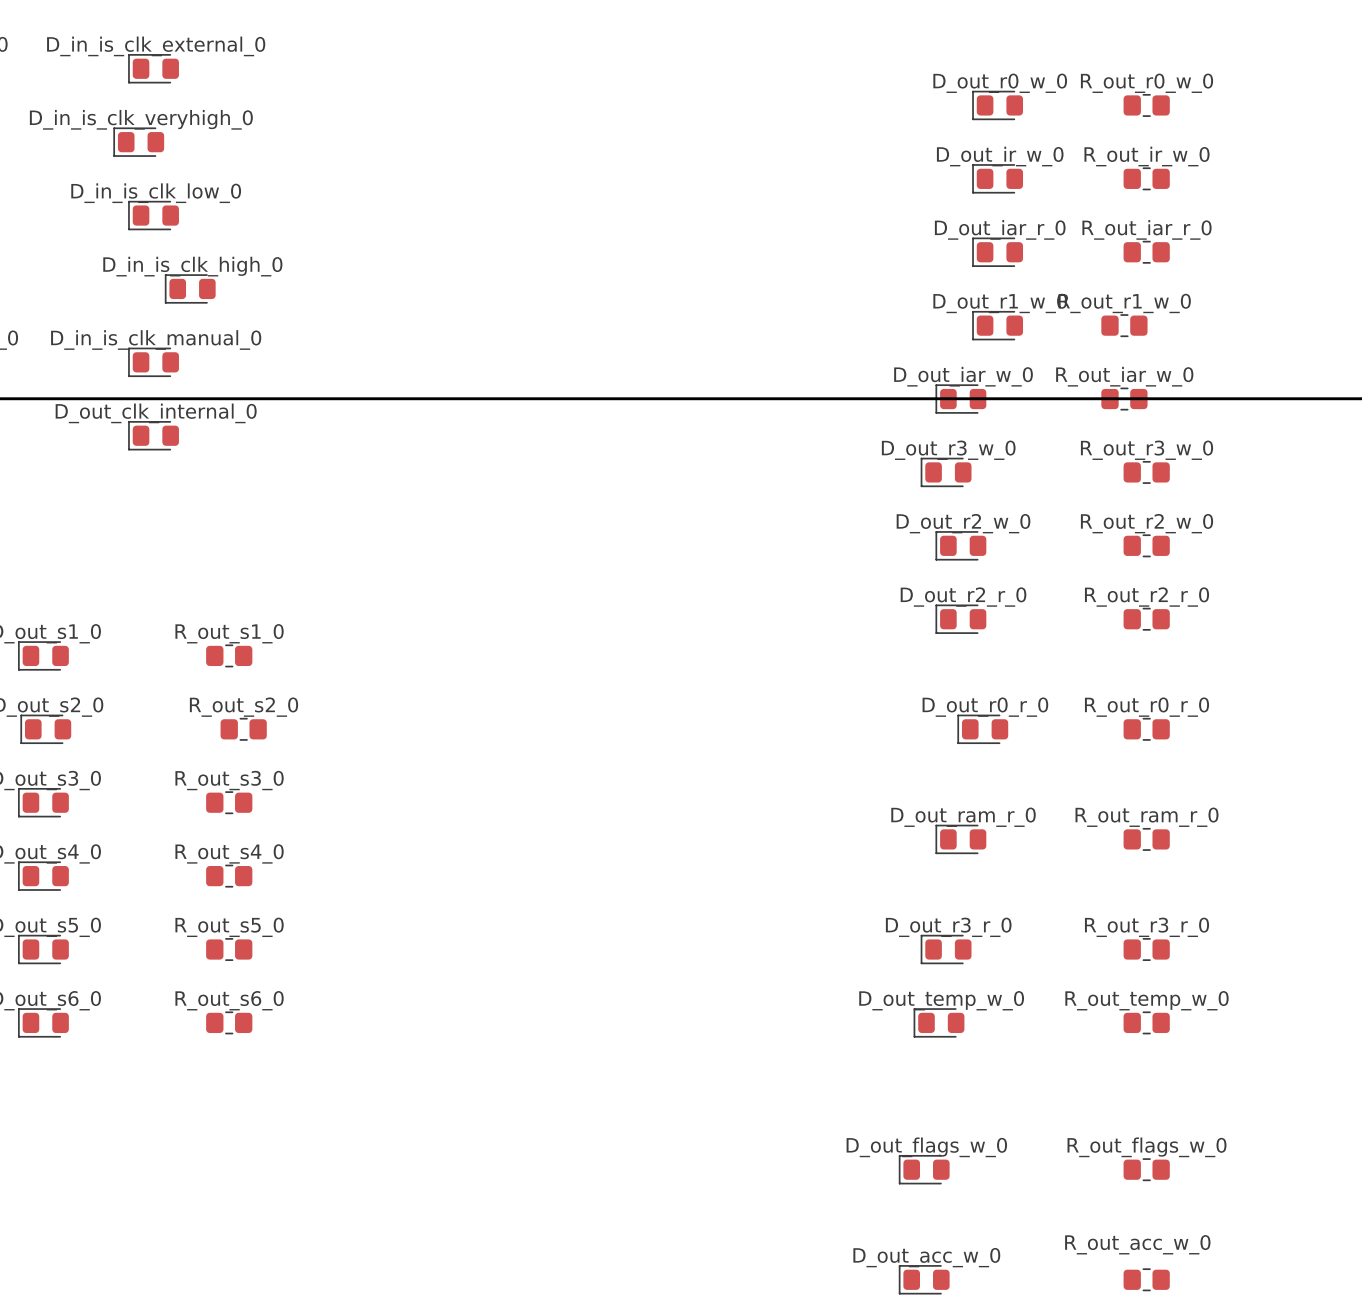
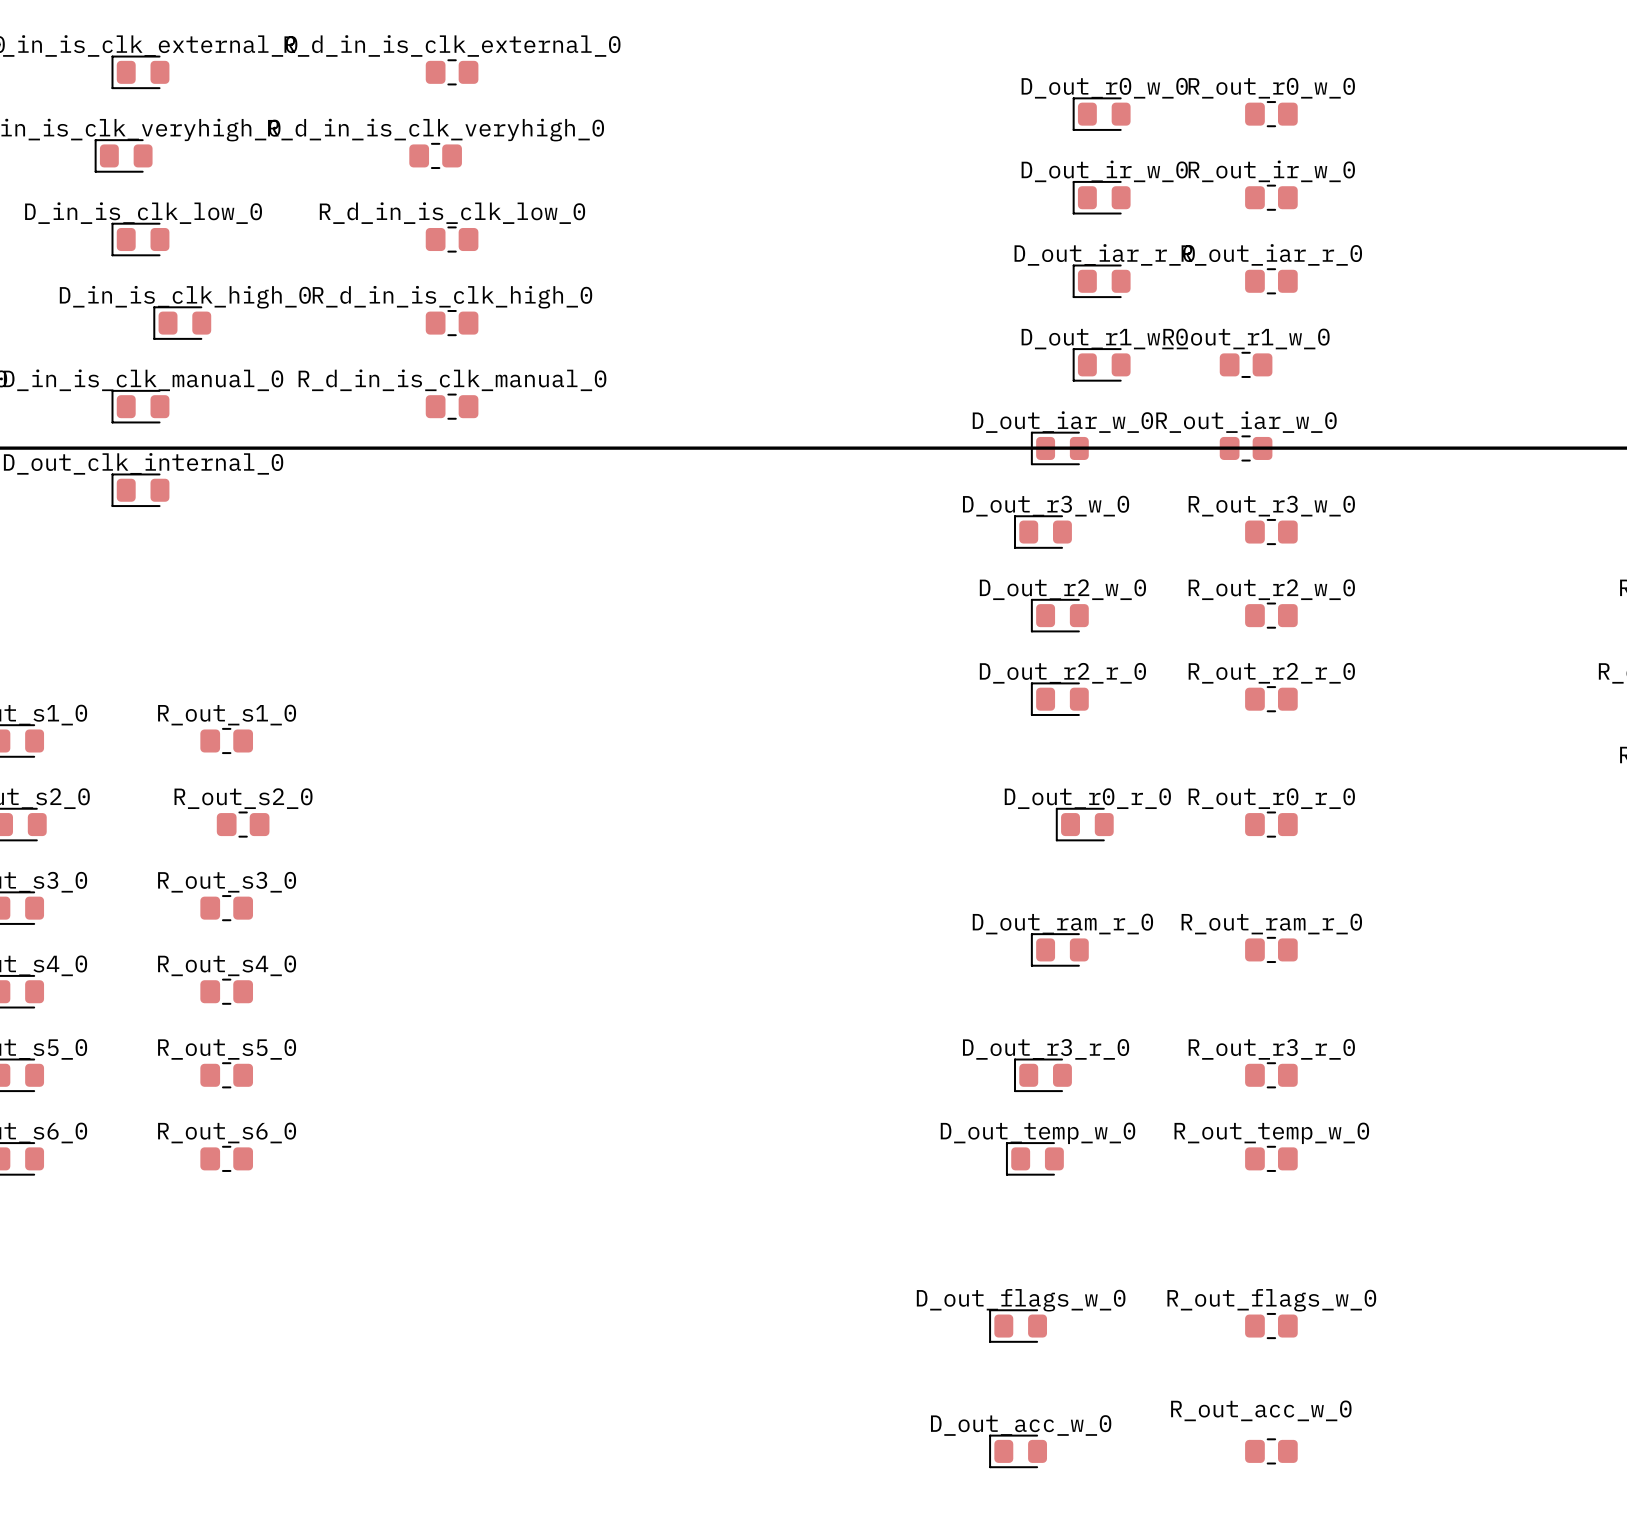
R_d_in_is_clk_external_0: none -> (452, 72)
R_d_in_is_clk_veryhigh_0: none -> (435, 155)
R_d_in_is_clk_low_0: none -> (452, 239)
R_d_in_is_clk_high_0: none -> (452, 323)
R_d_in_is_clk_manual_0: none -> (452, 406)

